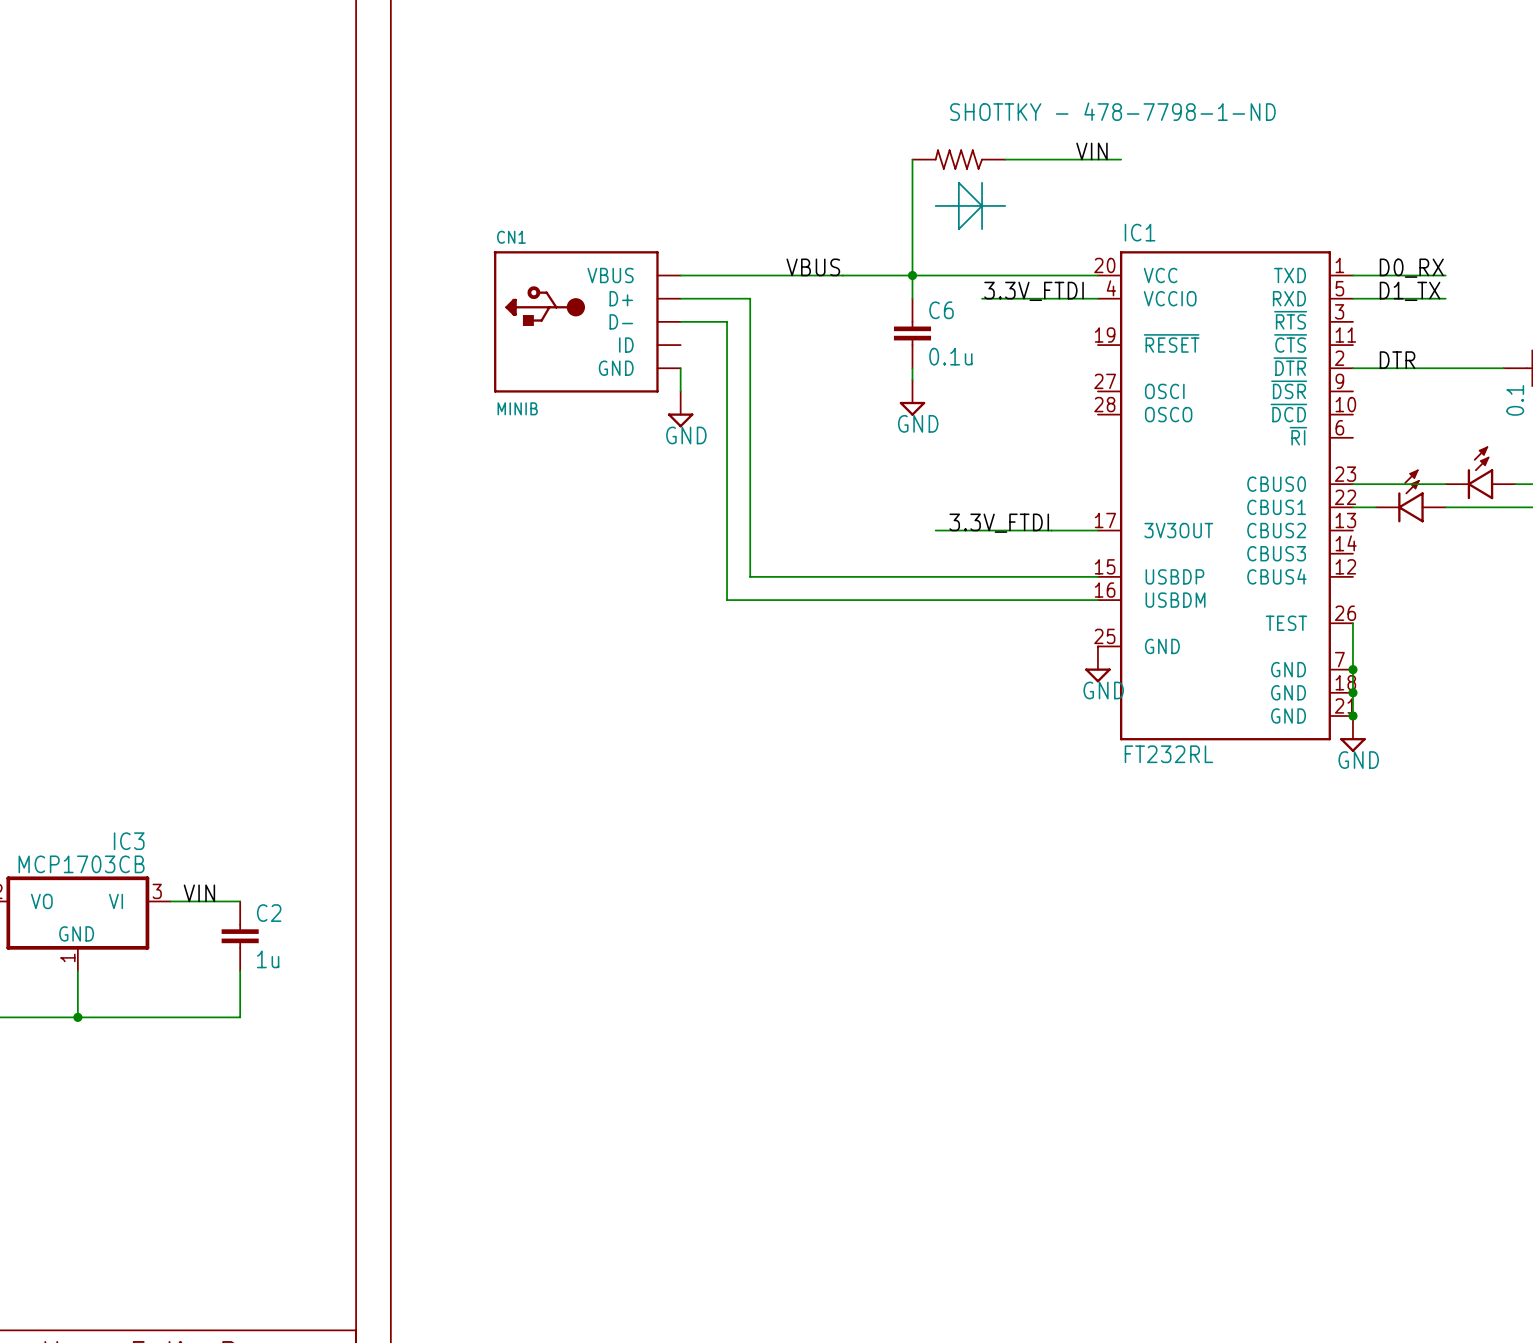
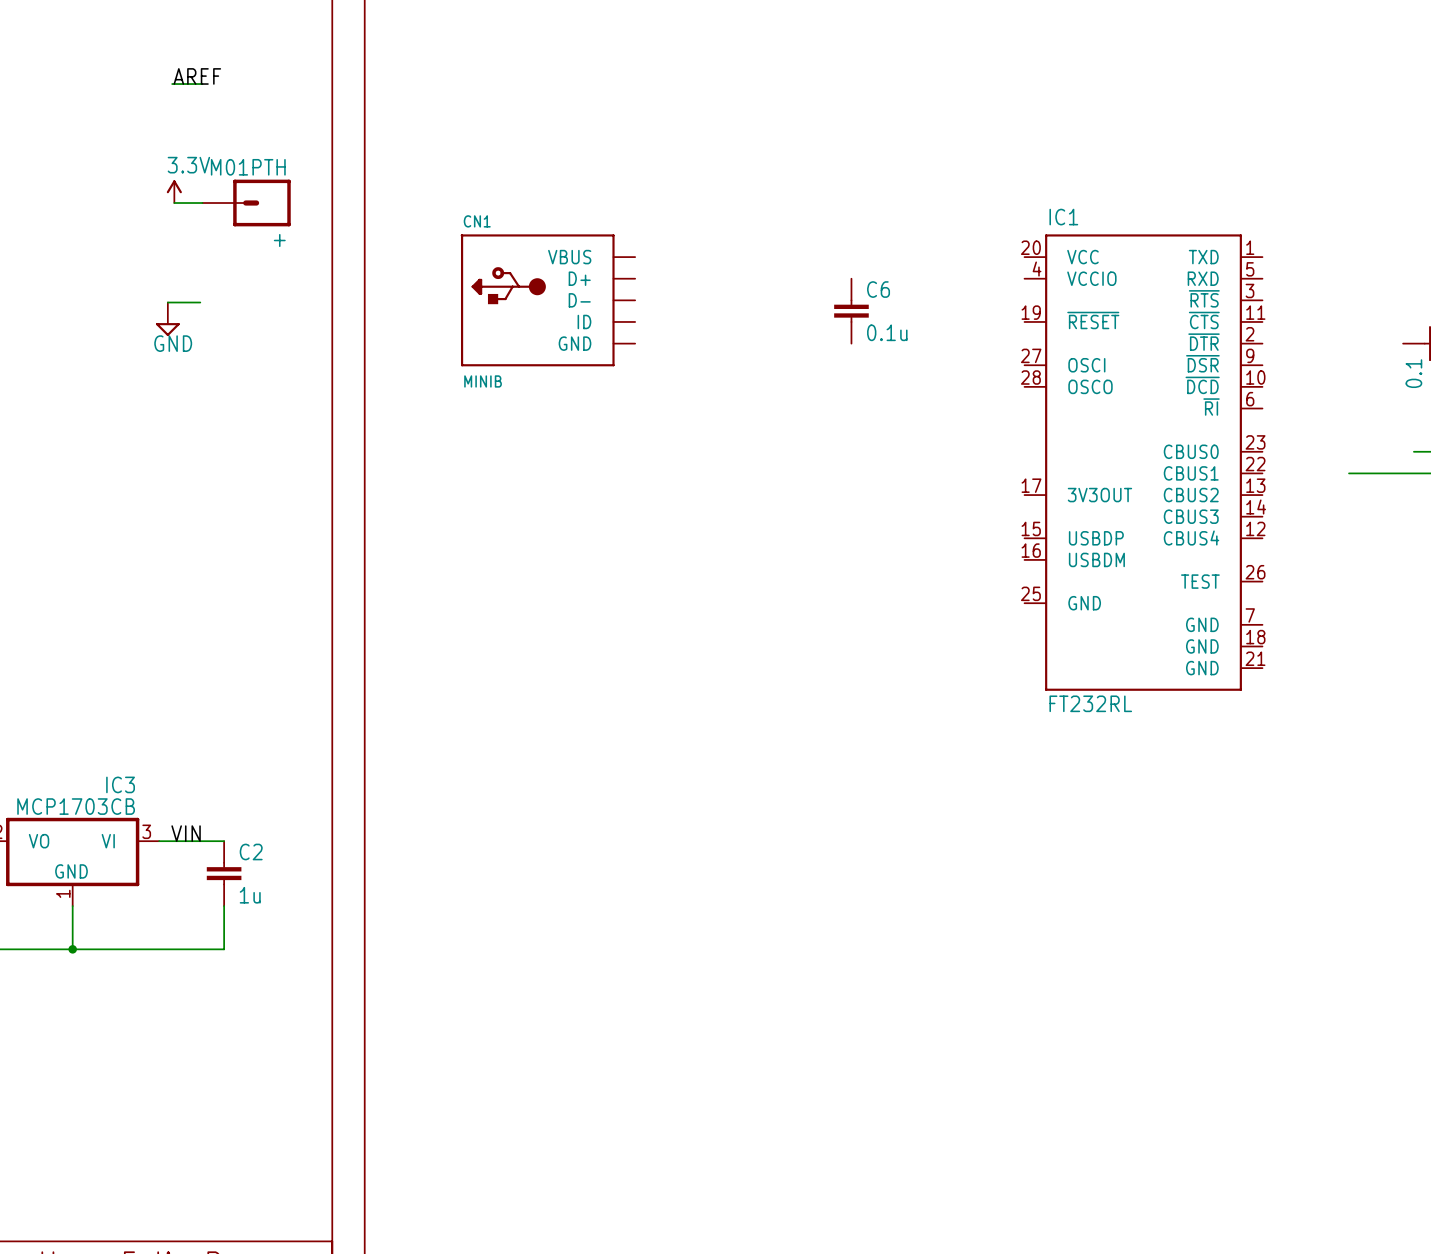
label: none -> AREF (197, 76)
wire: none -> (172, 84) (202, 84)
label: VIN (1091, 151) -> none
wire: (912, 159) (912, 298) -> none
part: SHOTTKY - 478-7798-1-ND (958, 159) -> none
wire: (1005, 159) (1121, 159) -> none
line: (958, 182) (958, 229) (982, 205) (958, 182) -> none
line: (982, 182) (982, 229) -> none
power symbol: none -> 3.3V (174, 191)
line: (935, 205) (1005, 205) -> none
wire: none -> (174, 203) (202, 203)
part: none -> M01PTH (246, 203)
label: VBUS (813, 267) -> none
label: D0_RX (1411, 268) -> none
wire: (680, 275) (1097, 275) -> none
junction: (912, 275) -> none
wire: (1352, 275) (1445, 275) -> none
label: 3.3V_FTDI (1034, 291) -> none
label: D1_TX (1410, 291) -> none
wire: (680, 298) (750, 298) (750, 576) (1097, 576) -> none
wire: (982, 298) (1097, 298) -> none
wire: (1352, 298) (1445, 298) -> none
wire: (680, 321) (727, 321) (727, 600) (1097, 600) -> none
wire: none -> (167, 302) (200, 302)
power symbol: none -> GND (167, 319)
label: DTR (1397, 360) -> none
wire: (680, 368) (680, 391) -> none
wire: (912, 368) (912, 379) -> none
wire: (1352, 368) (1503, 368) -> none
power symbol: GND (912, 397) -> none
power symbol: GND (680, 409) -> none
part: (1480, 472) -> none
wire: (1352, 484) (1445, 484) -> none
part: (1410, 495) -> none
wire: (1352, 507) (1376, 507) -> none
label: 3.3V_FTDI (999, 523) -> none
wire: (935, 530) (1097, 530) -> none
wire: (1352, 623) (1352, 716) -> none
power symbol: GND (1097, 664) -> none
junction: (1352, 669) -> none
junction: (1352, 692) -> none
junction: (1352, 716) -> none
power symbol: GND (1352, 733) -> none

